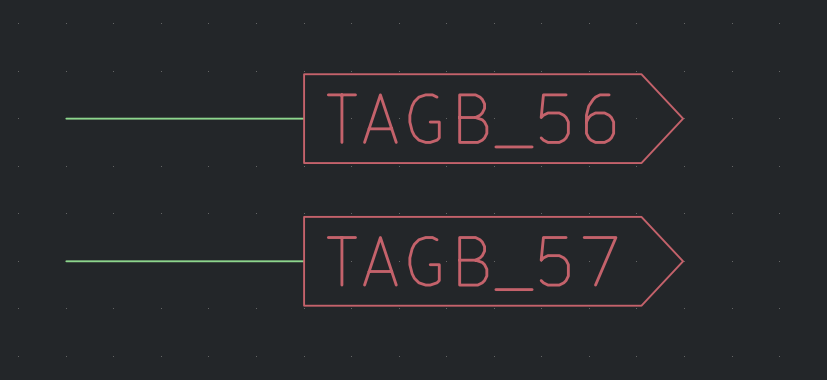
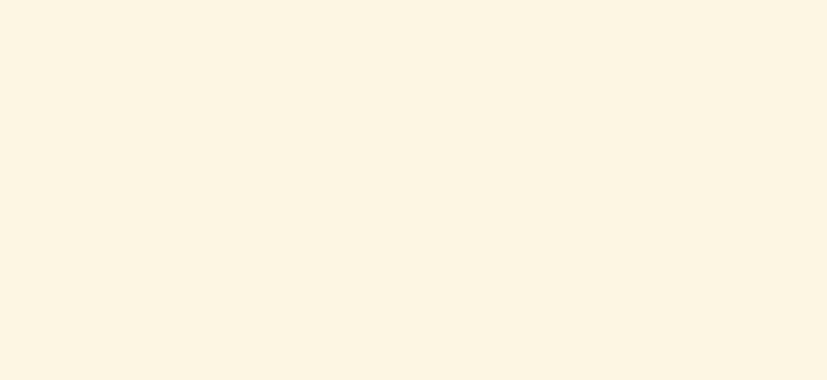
wire: (66, 118) (304, 118) -> none
global label: TAGB_56 (470, 120) -> none
wire: (66, 261) (304, 261) -> none
global label: TAGB_57 (472, 263) -> none

